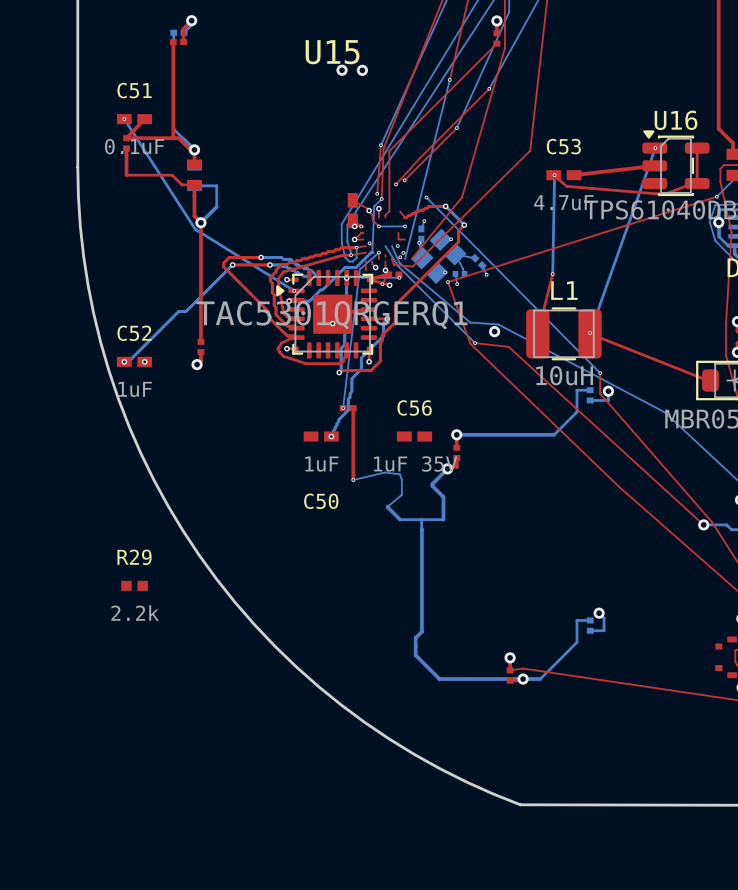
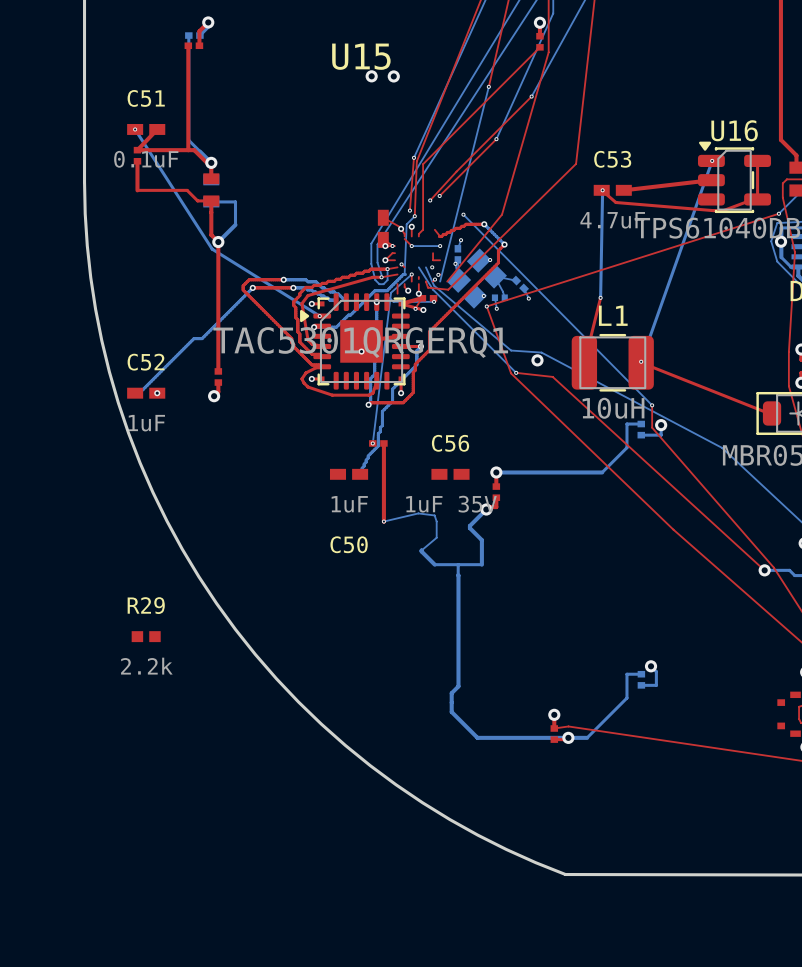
via: (124, 361) -> none
via: (331, 436) -> none

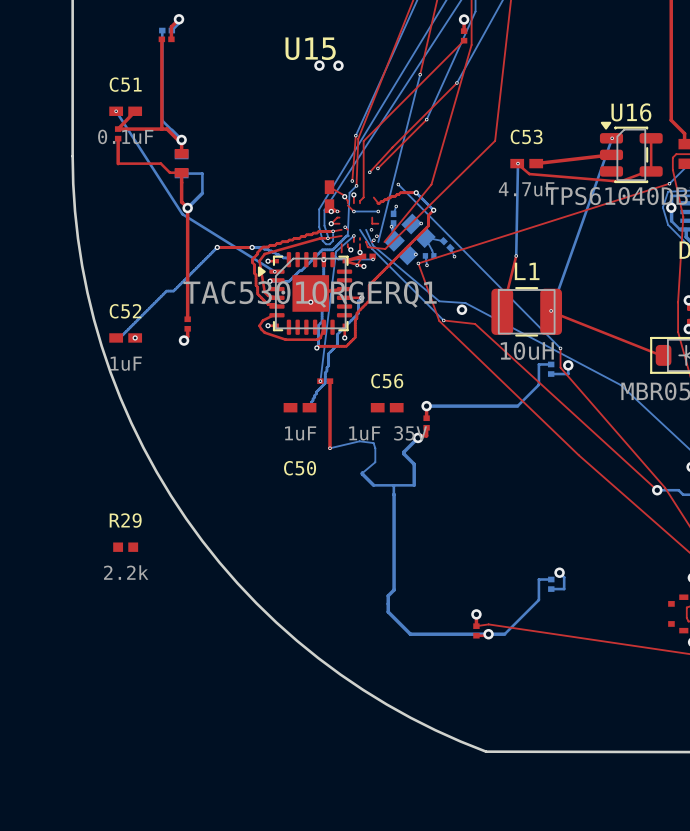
top track: (283, 279) (249, 279) (243, 285) (243, 289) (291, 338) (293, 346) (312, 365) (320, 365) (322, 367) -> none
bottom track: (283, 279) (316, 281) (322, 287) (338, 294) (346, 302) -> none
via: (283, 279) -> none

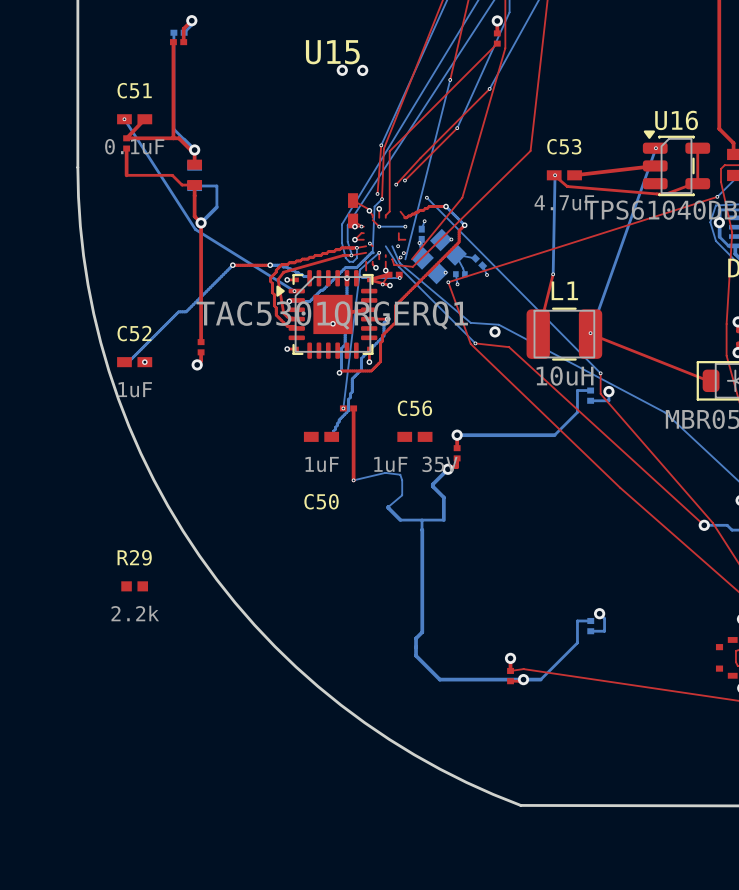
top track: (276, 315) (263, 320) (259, 325) (264, 332) (285, 339) (317, 339) (320, 337) (324, 327) -> none

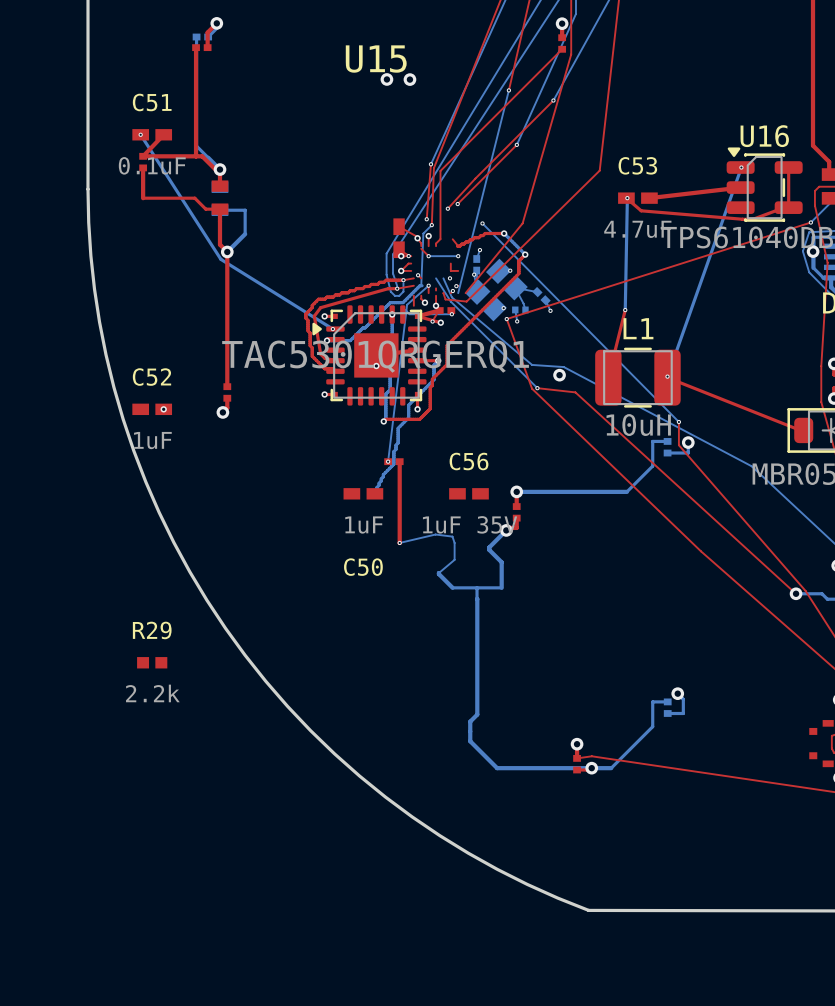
top track: (232, 265) (270, 265) -> none
bottom track: (232, 265) (186, 311) (178, 311) (130, 360) (124, 362) -> none
via: (232, 265) -> none
bottom track: (270, 265) (281, 265) (309, 278) -> none
via: (270, 265) -> none

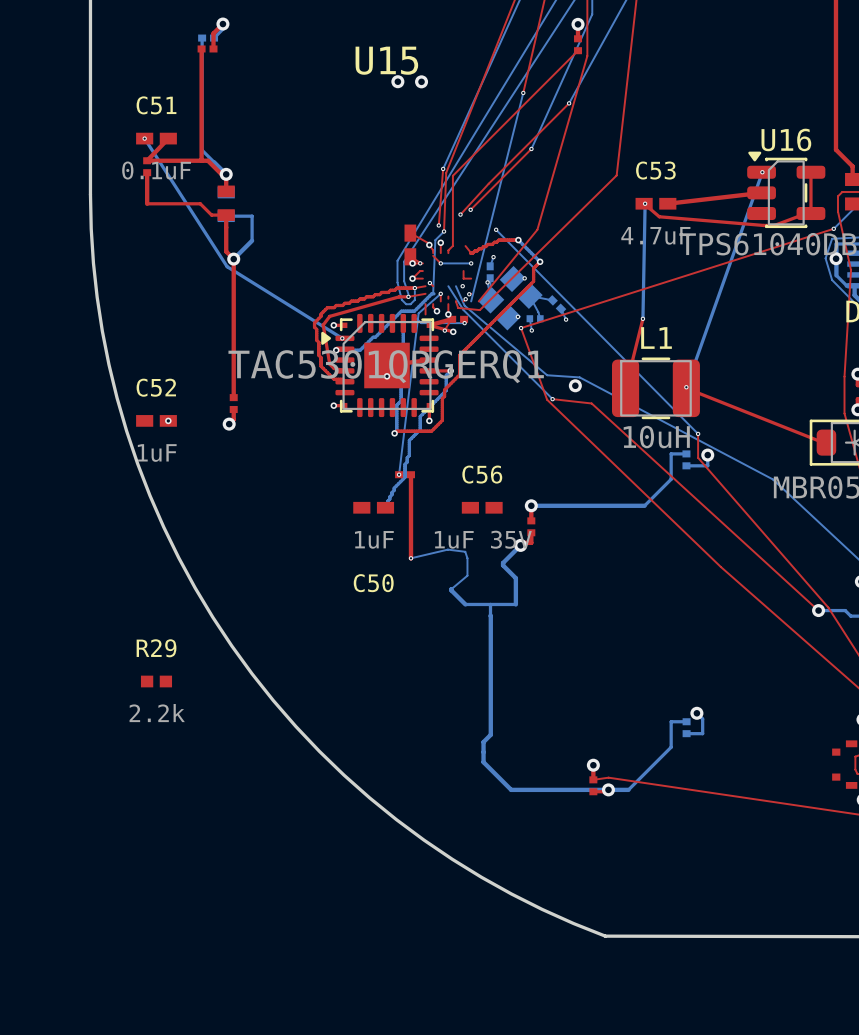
via: (392, 314) -> none

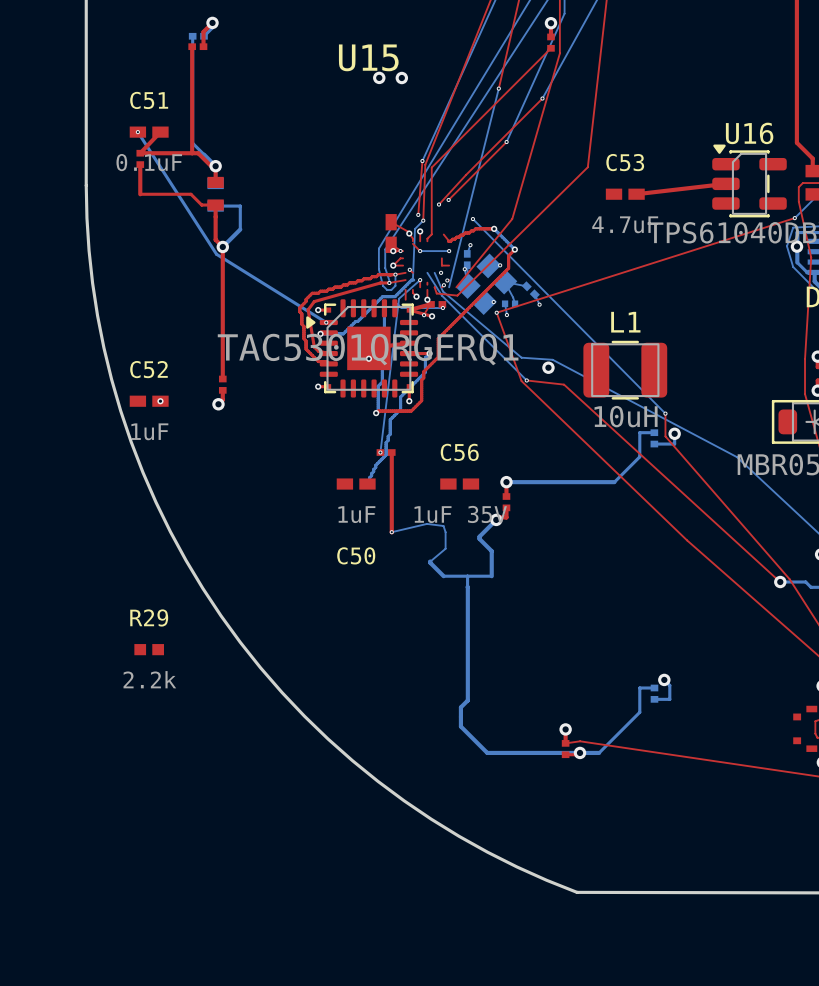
bottom track: (762, 172) (686, 387) -> none
via: (762, 172) -> none
top track: (810, 172) (810, 213) (809, 212) (774, 225) (659, 216) (645, 203) -> none
bottom track: (645, 203) (642, 318) -> none
via: (645, 203) -> none
top track: (642, 318) (625, 388) -> none
via: (642, 318) -> none
top track: (686, 387) (826, 442) -> none
via: (686, 387) -> none

